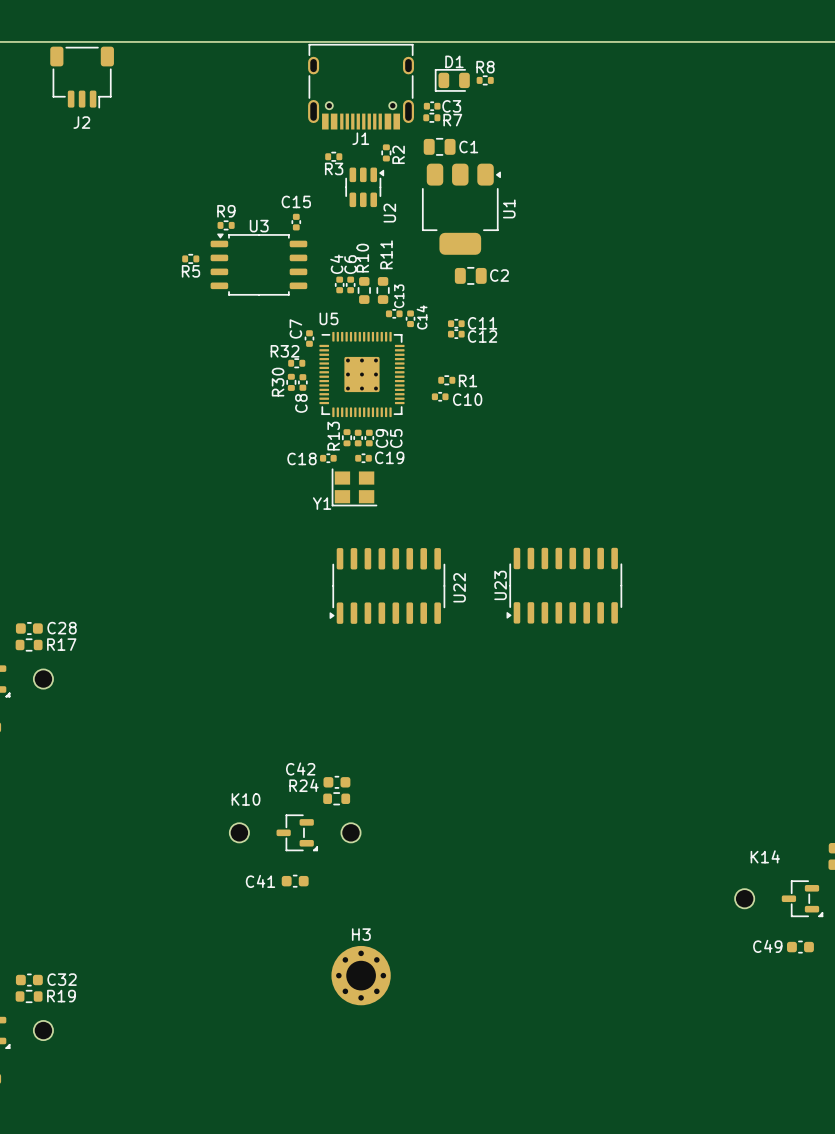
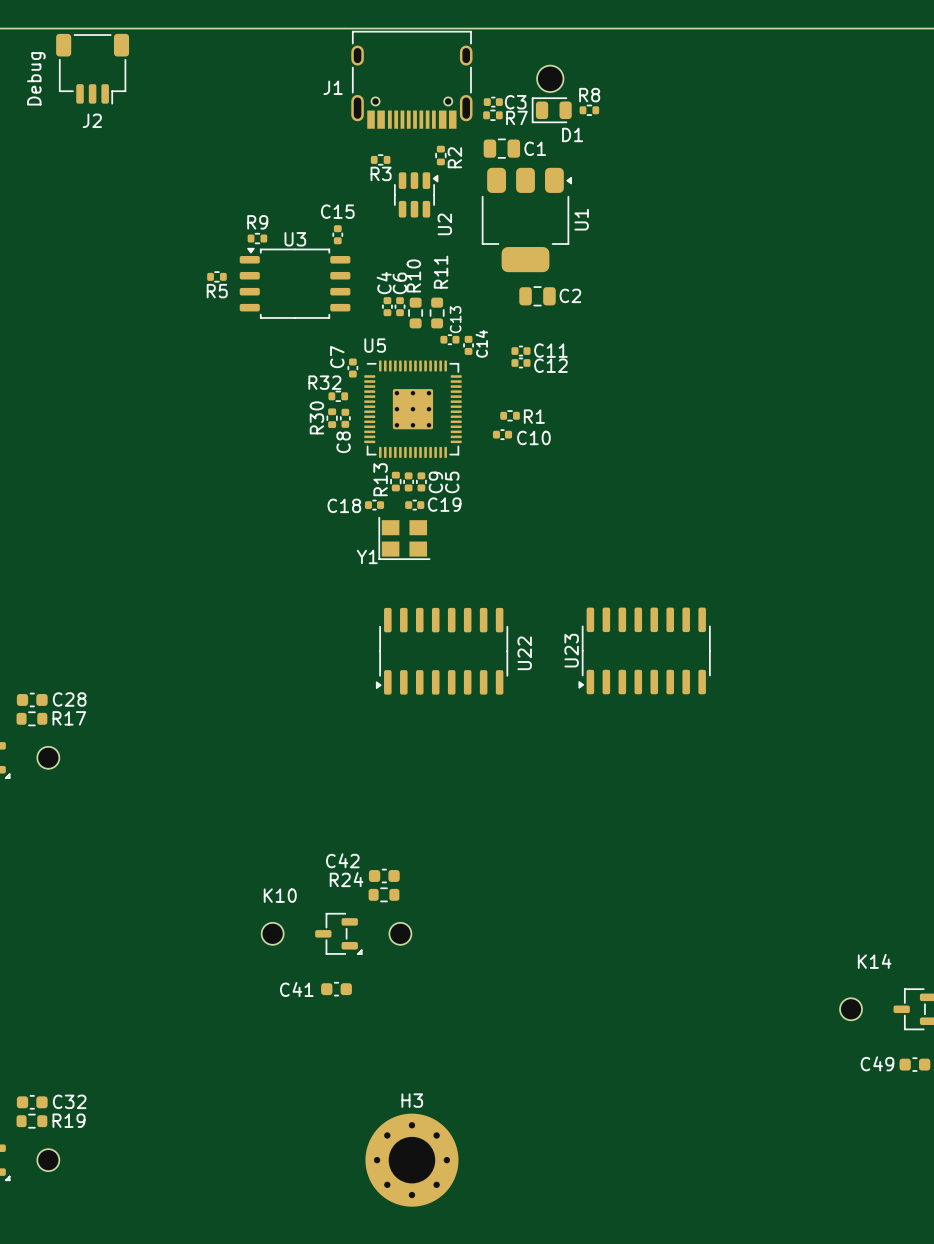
D1 name position: D1 (454, 61) -> D1 (572, 134)
D1 position: (452, 80) -> (551, 110)
R8 position: (485, 80) -> (589, 110)
text: none -> Debug (36, 78)
part: none -> (550, 78)
J1 name position: J1 (360, 138) -> J1 (333, 87)
H3 footprint: [331, 945, 391, 1006] -> [365, 1113, 459, 1207]

